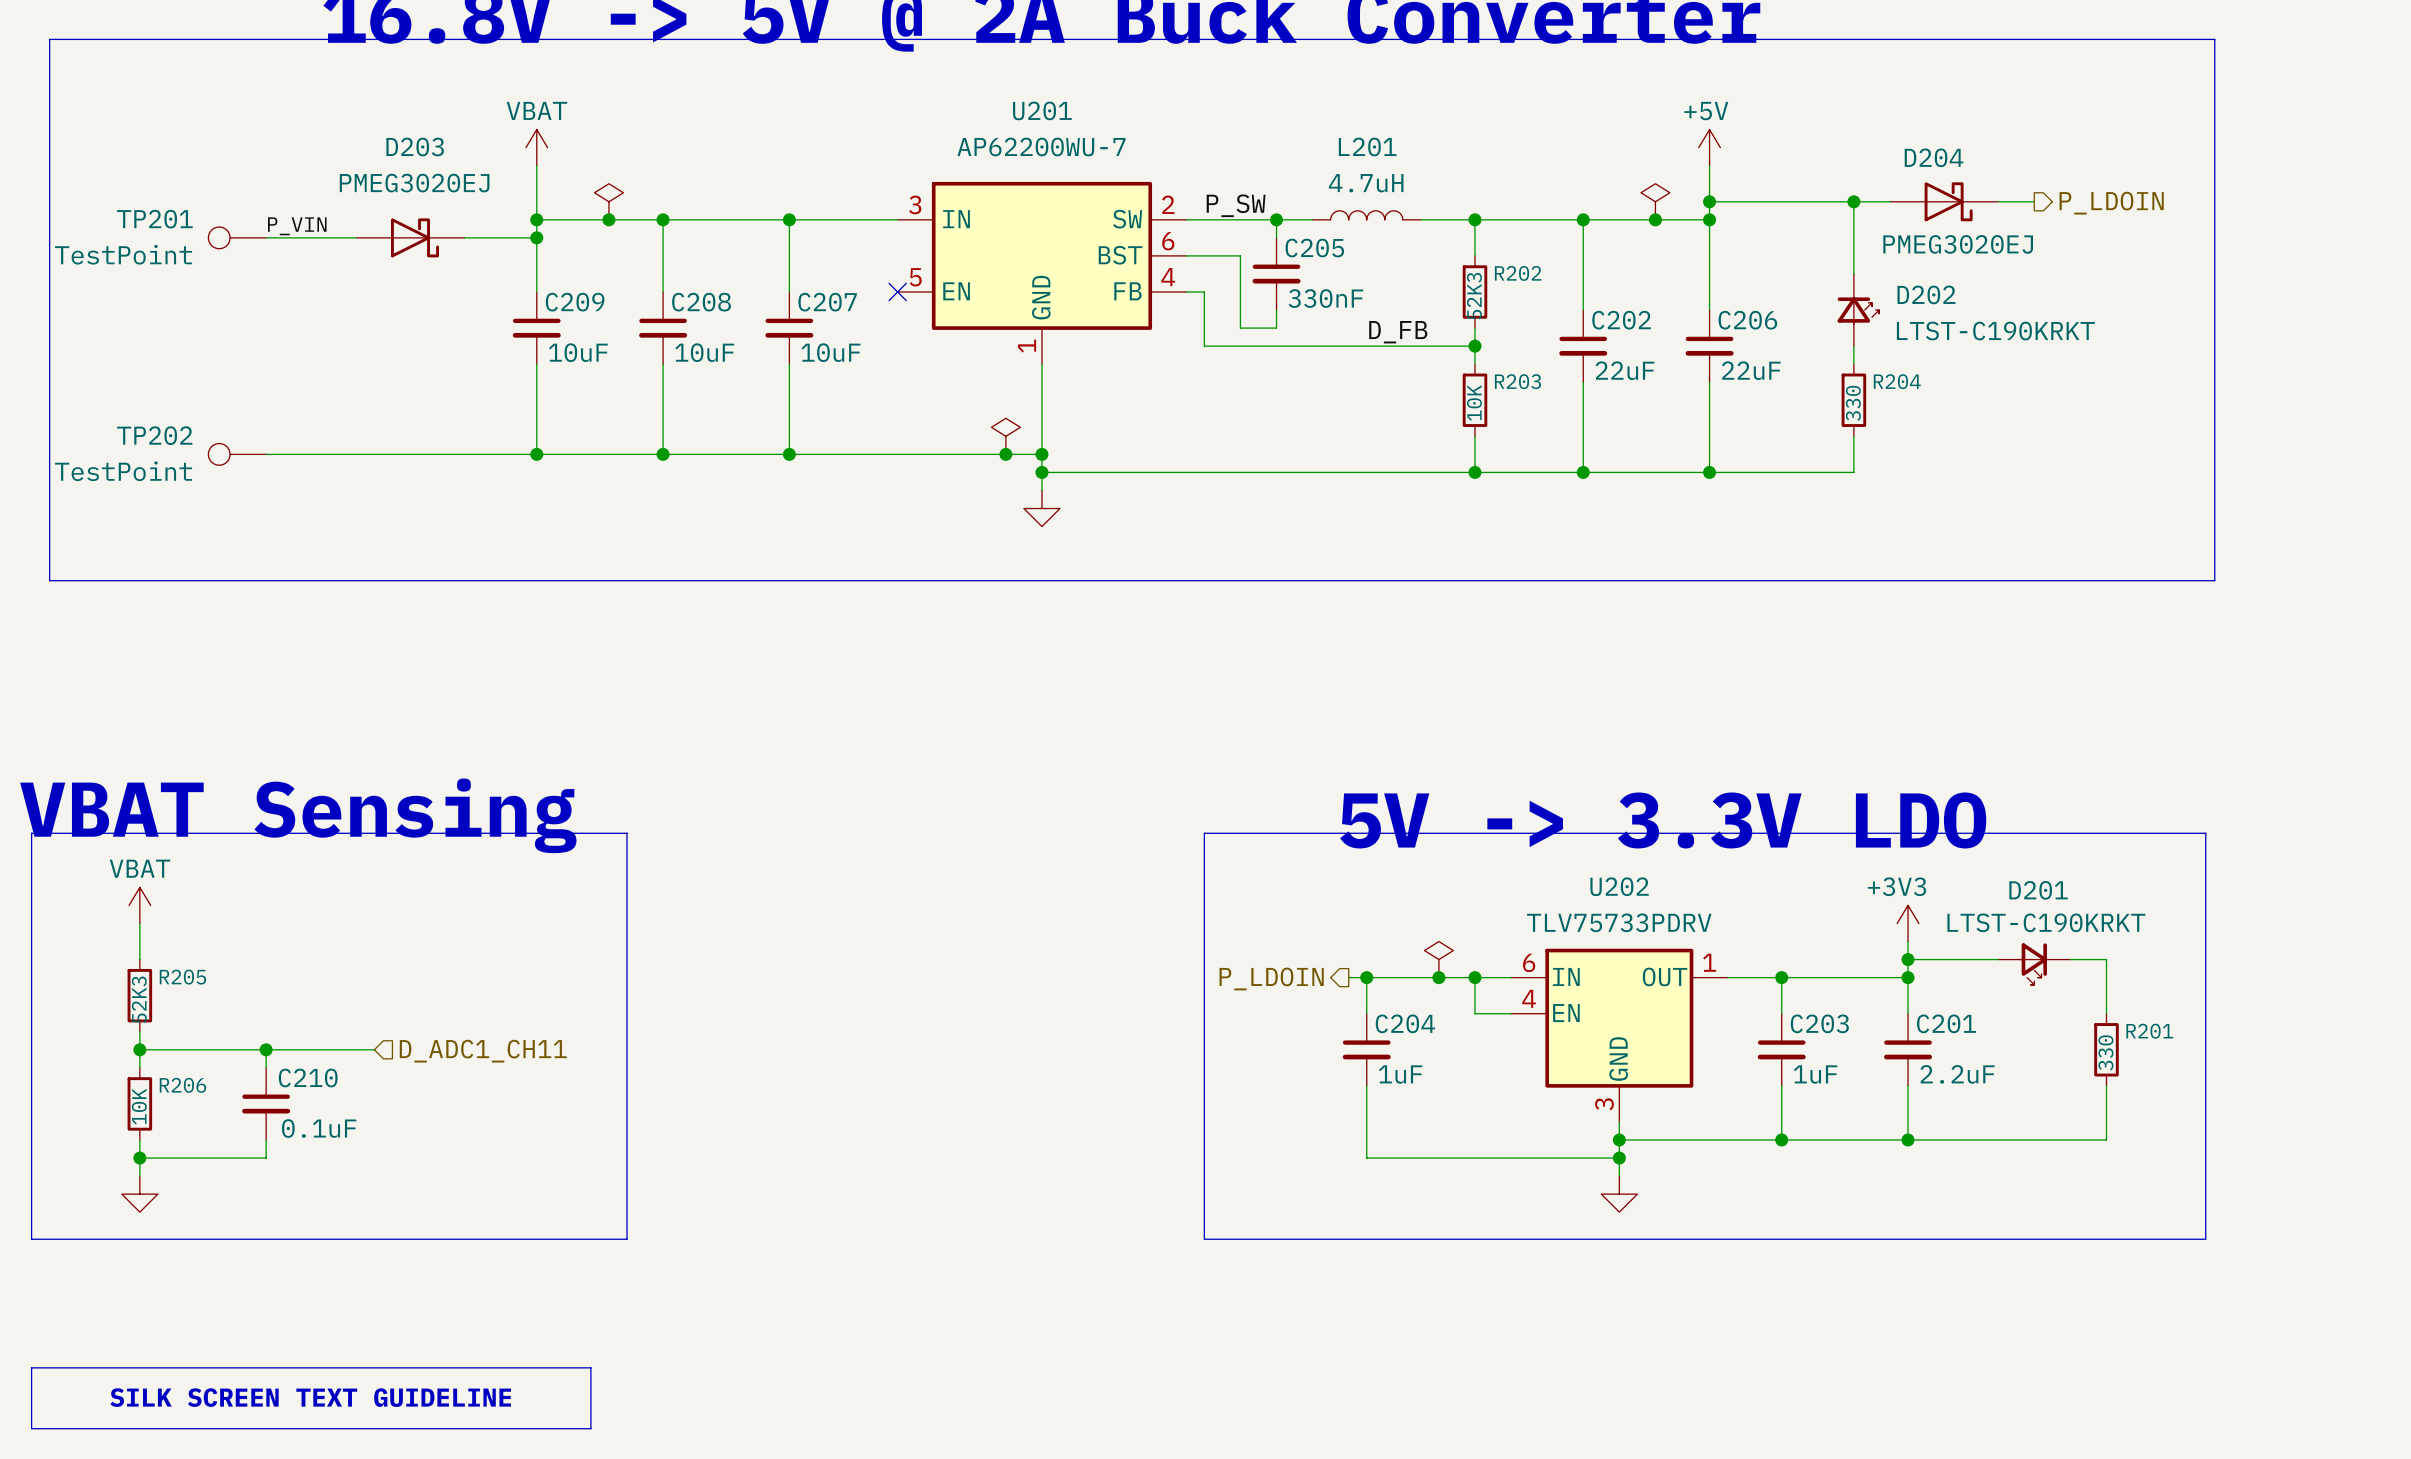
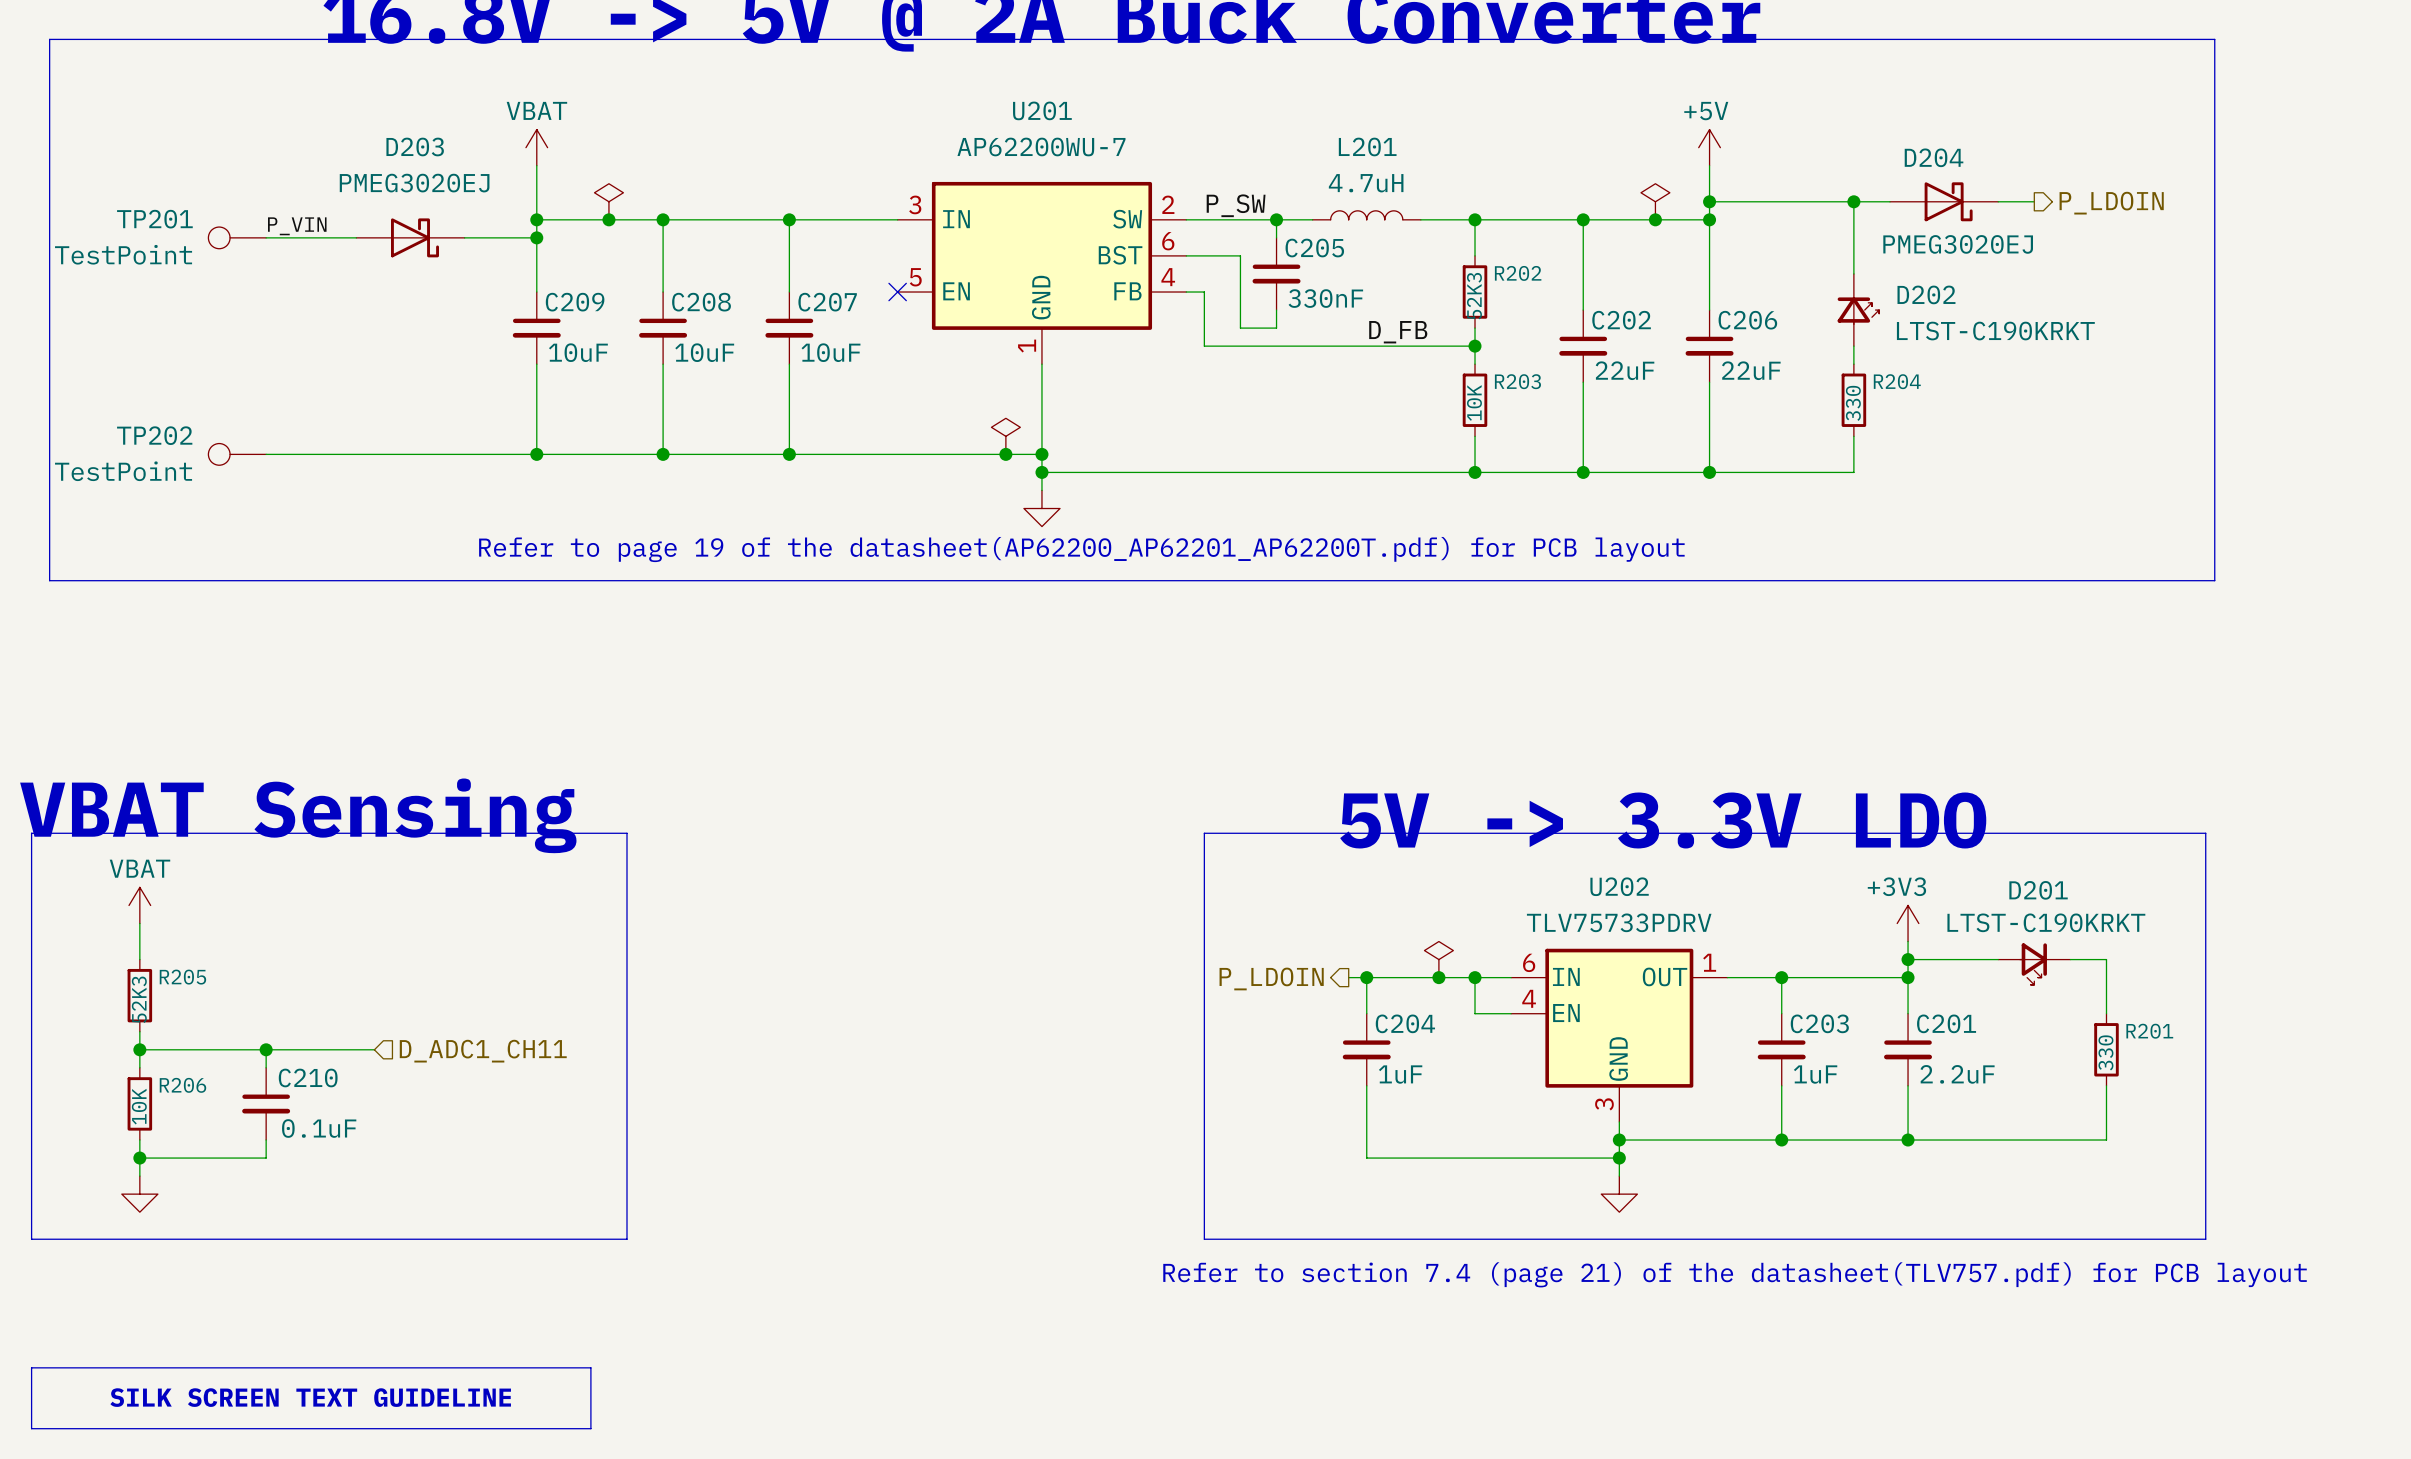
text: none -> Refer to page 19 of the datasheet(AP62200_AP62201_AP62200T.pdf) for PCB layout (1081, 549)
text: none -> Refer to section 7.4 (page 21) of the datasheet(TLV757.pdf) for PCB layout (1735, 1274)

